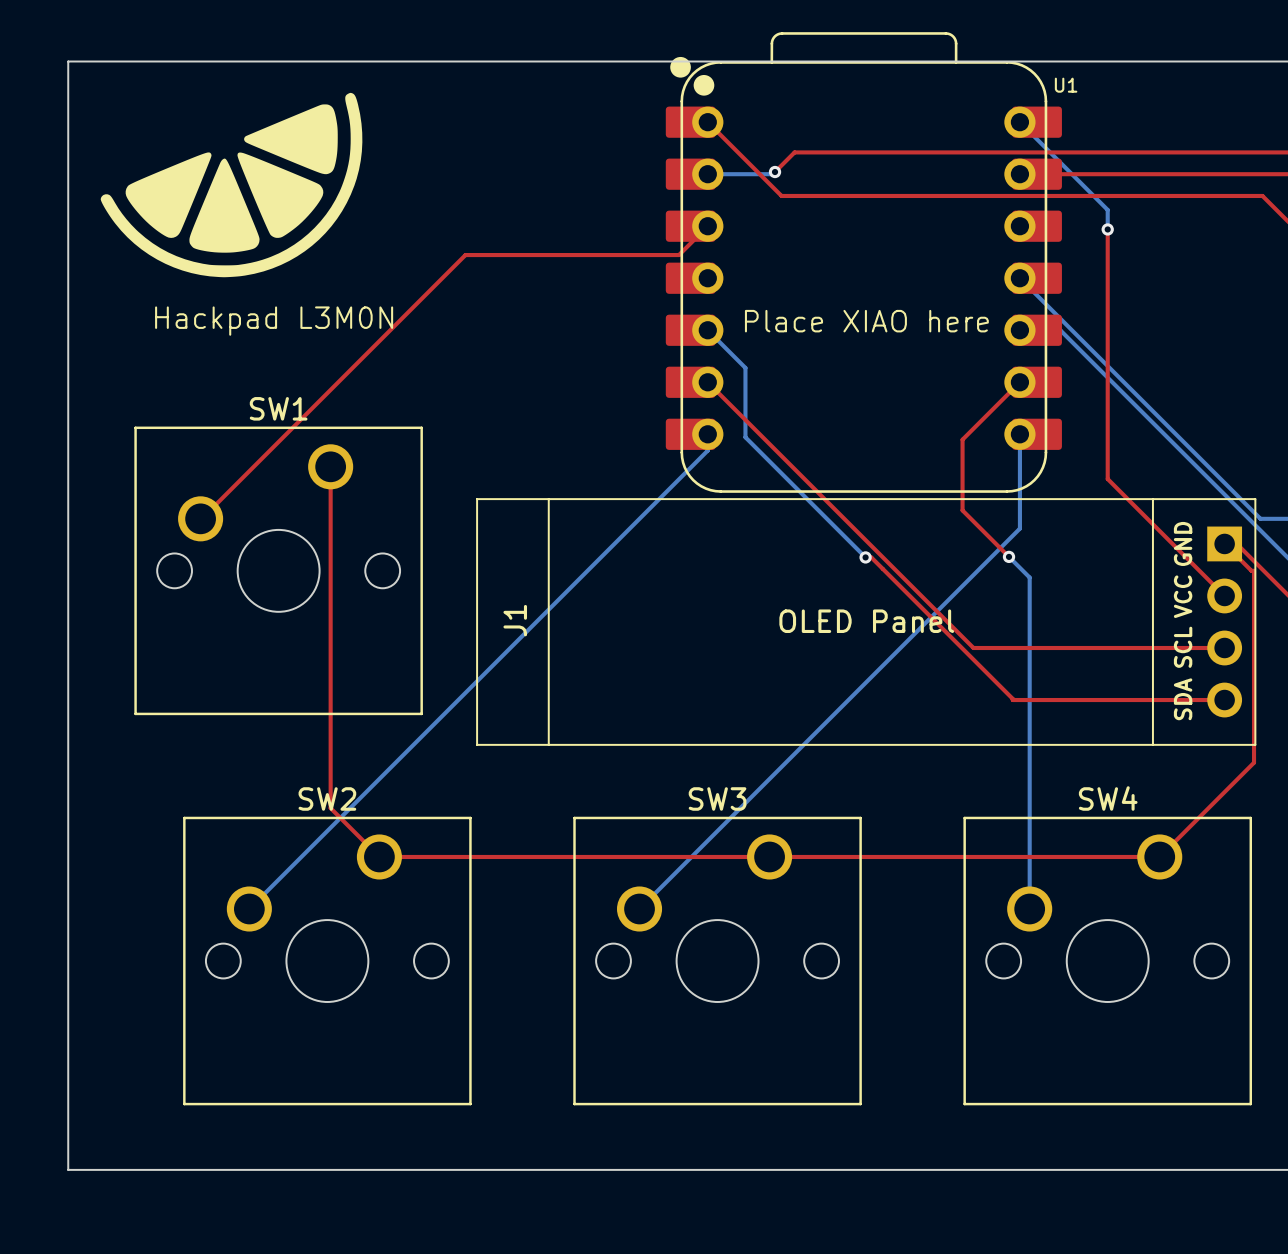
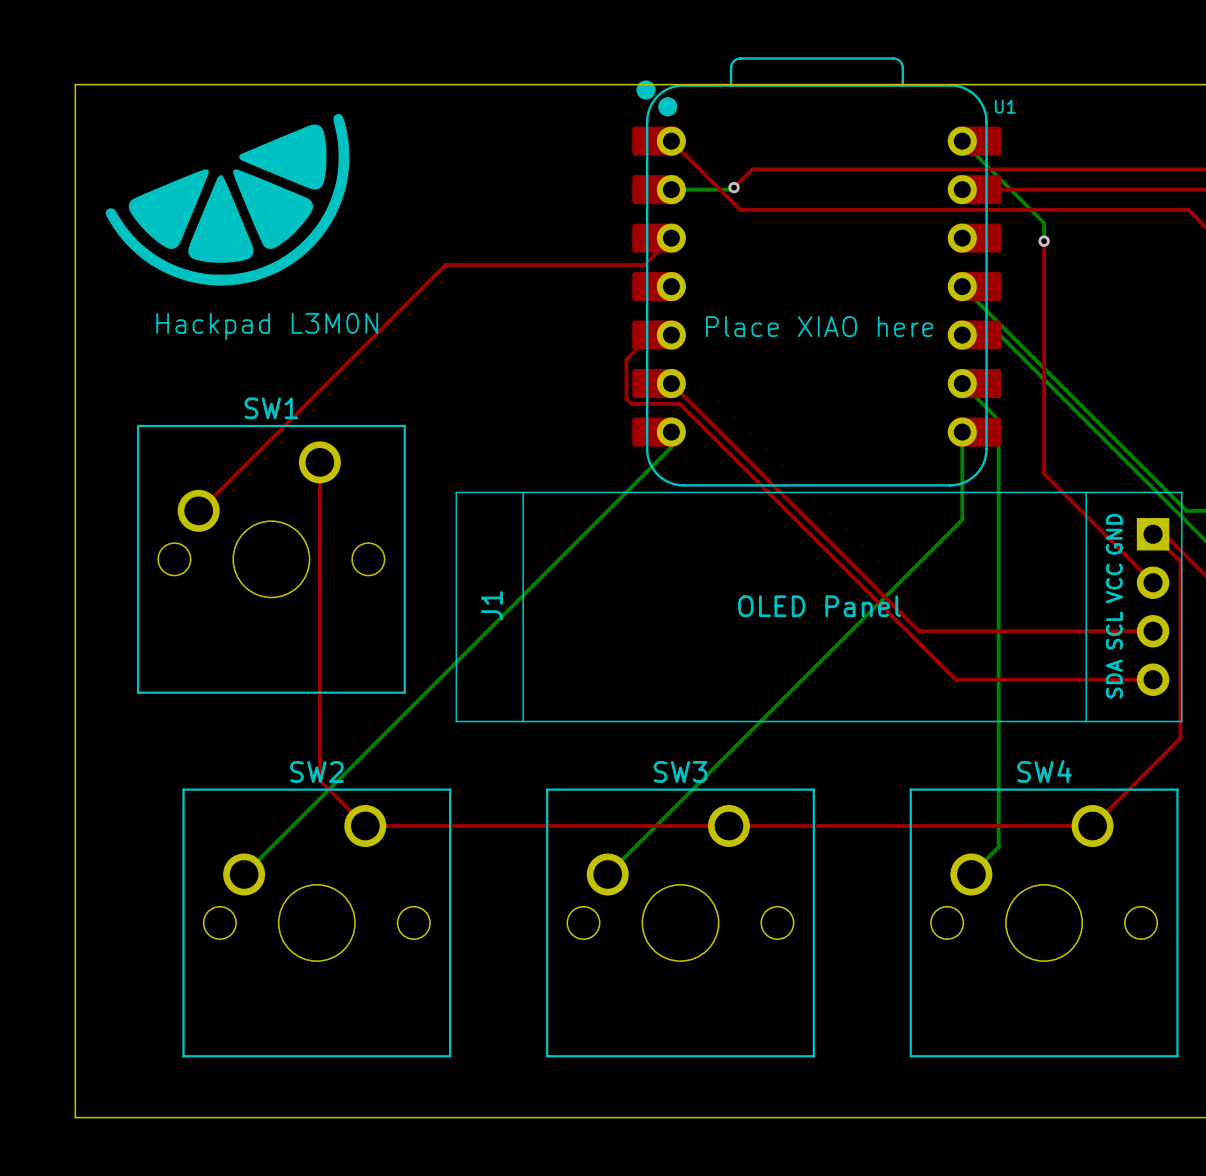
bottom track: (707, 330) (745, 367) (745, 437) (865, 557) -> none
top track: (1019, 382) (962, 439) (962, 510) (1009, 556) -> none
bottom track: (1009, 556) (1029, 577) (1029, 909) -> (962, 383) (998, 419) (998, 847) (971, 874)
via: (1009, 556) -> none
top track: (865, 557) (871, 557) (1012, 700) -> (650, 335) (626, 359) (626, 398) (631, 403) (679, 403) (955, 679)
via: (865, 557) -> none

